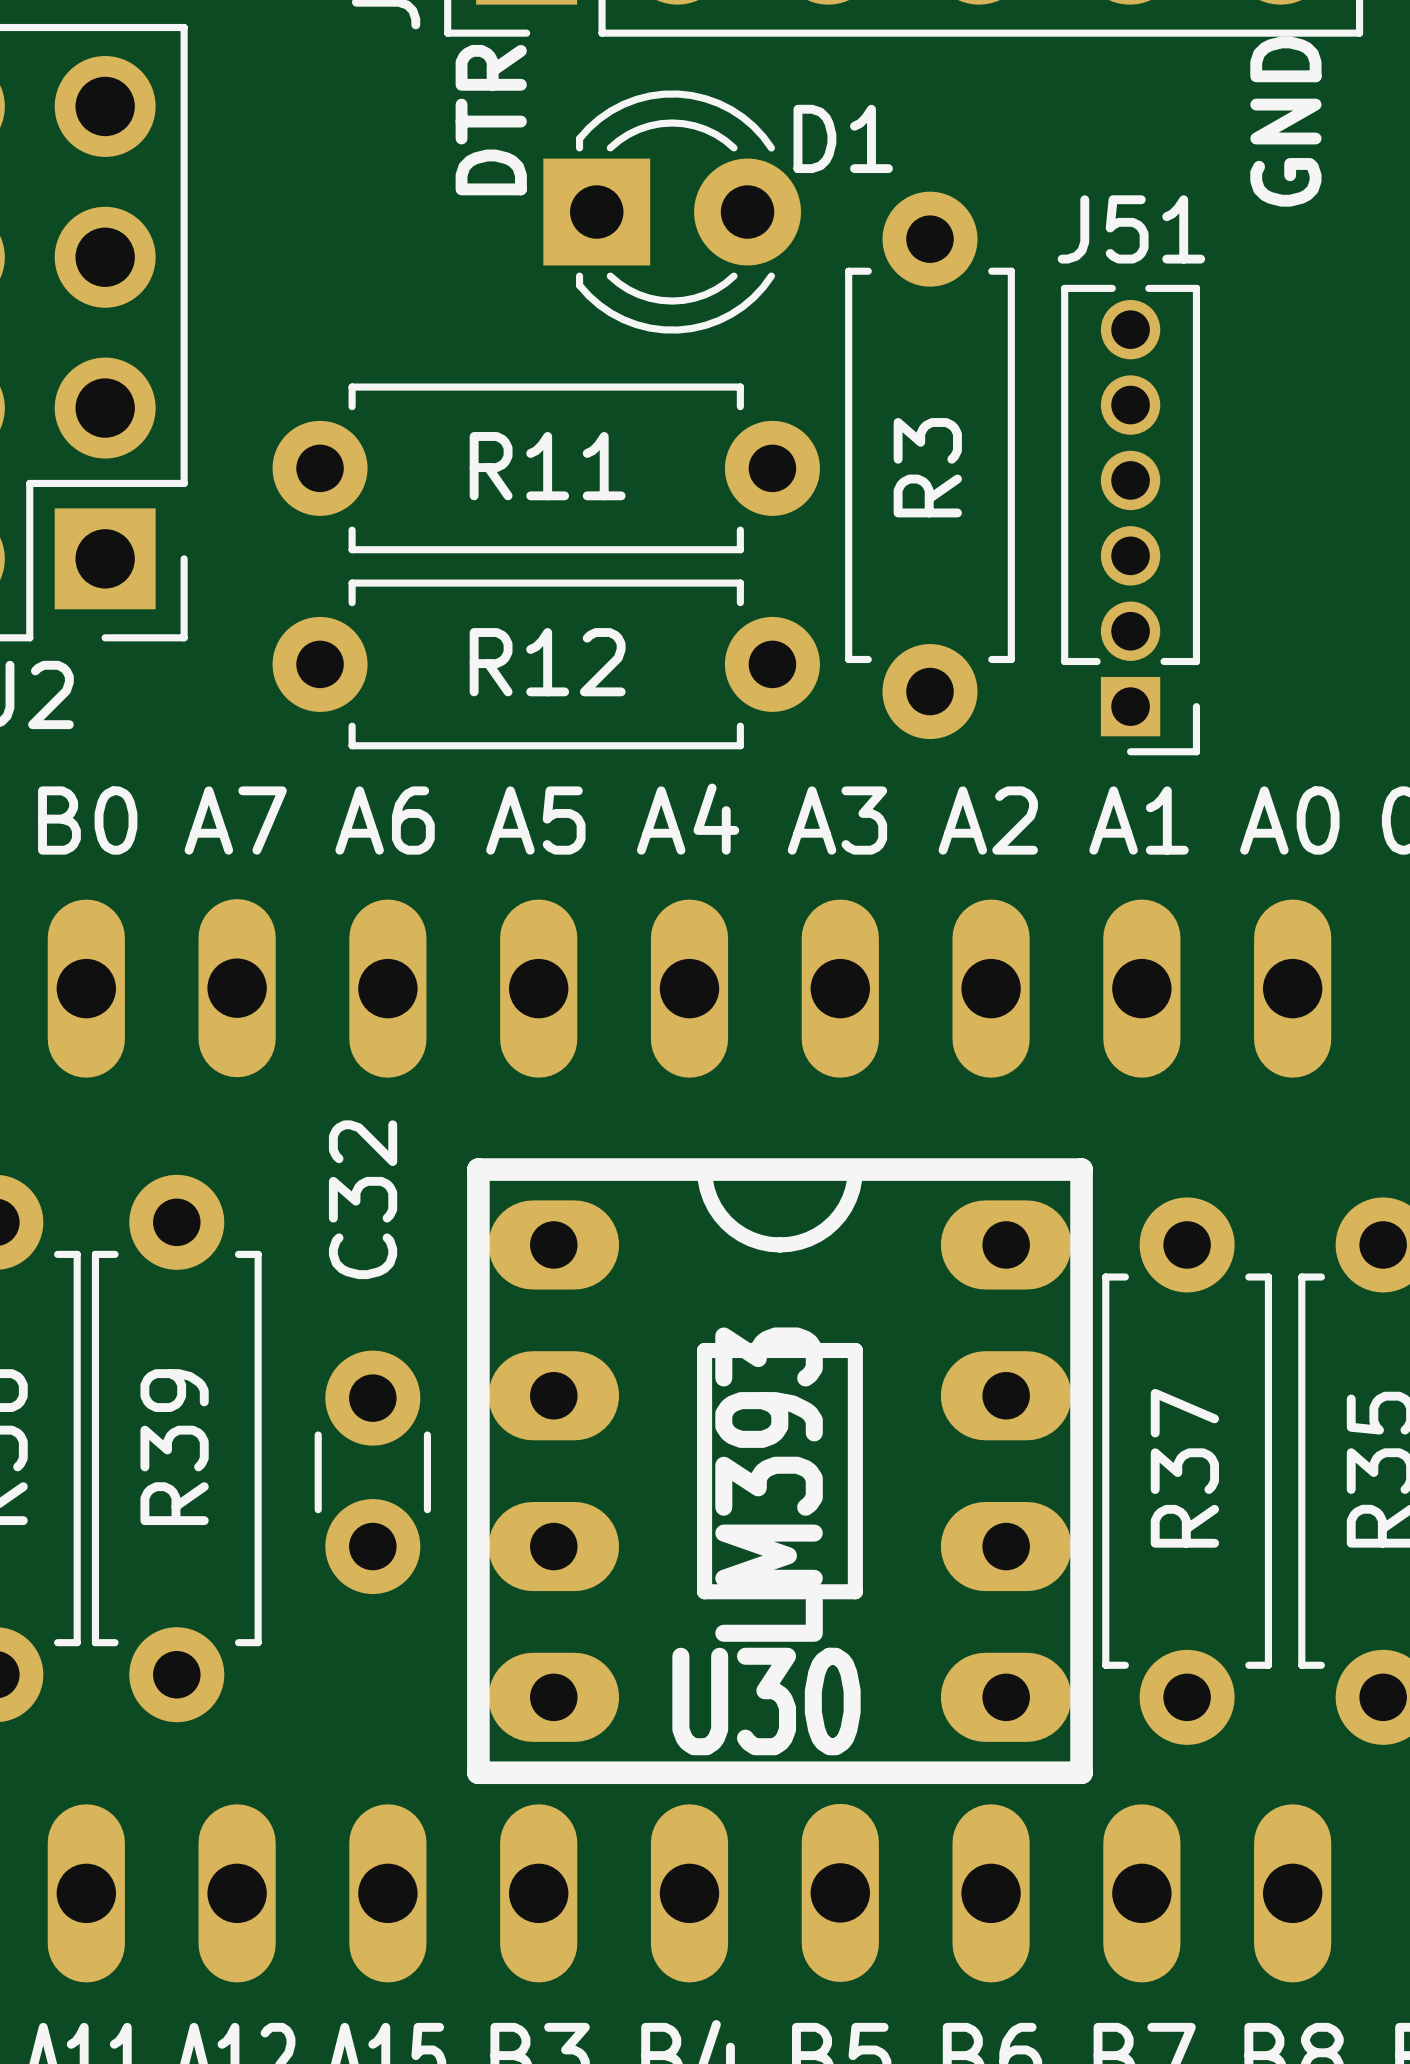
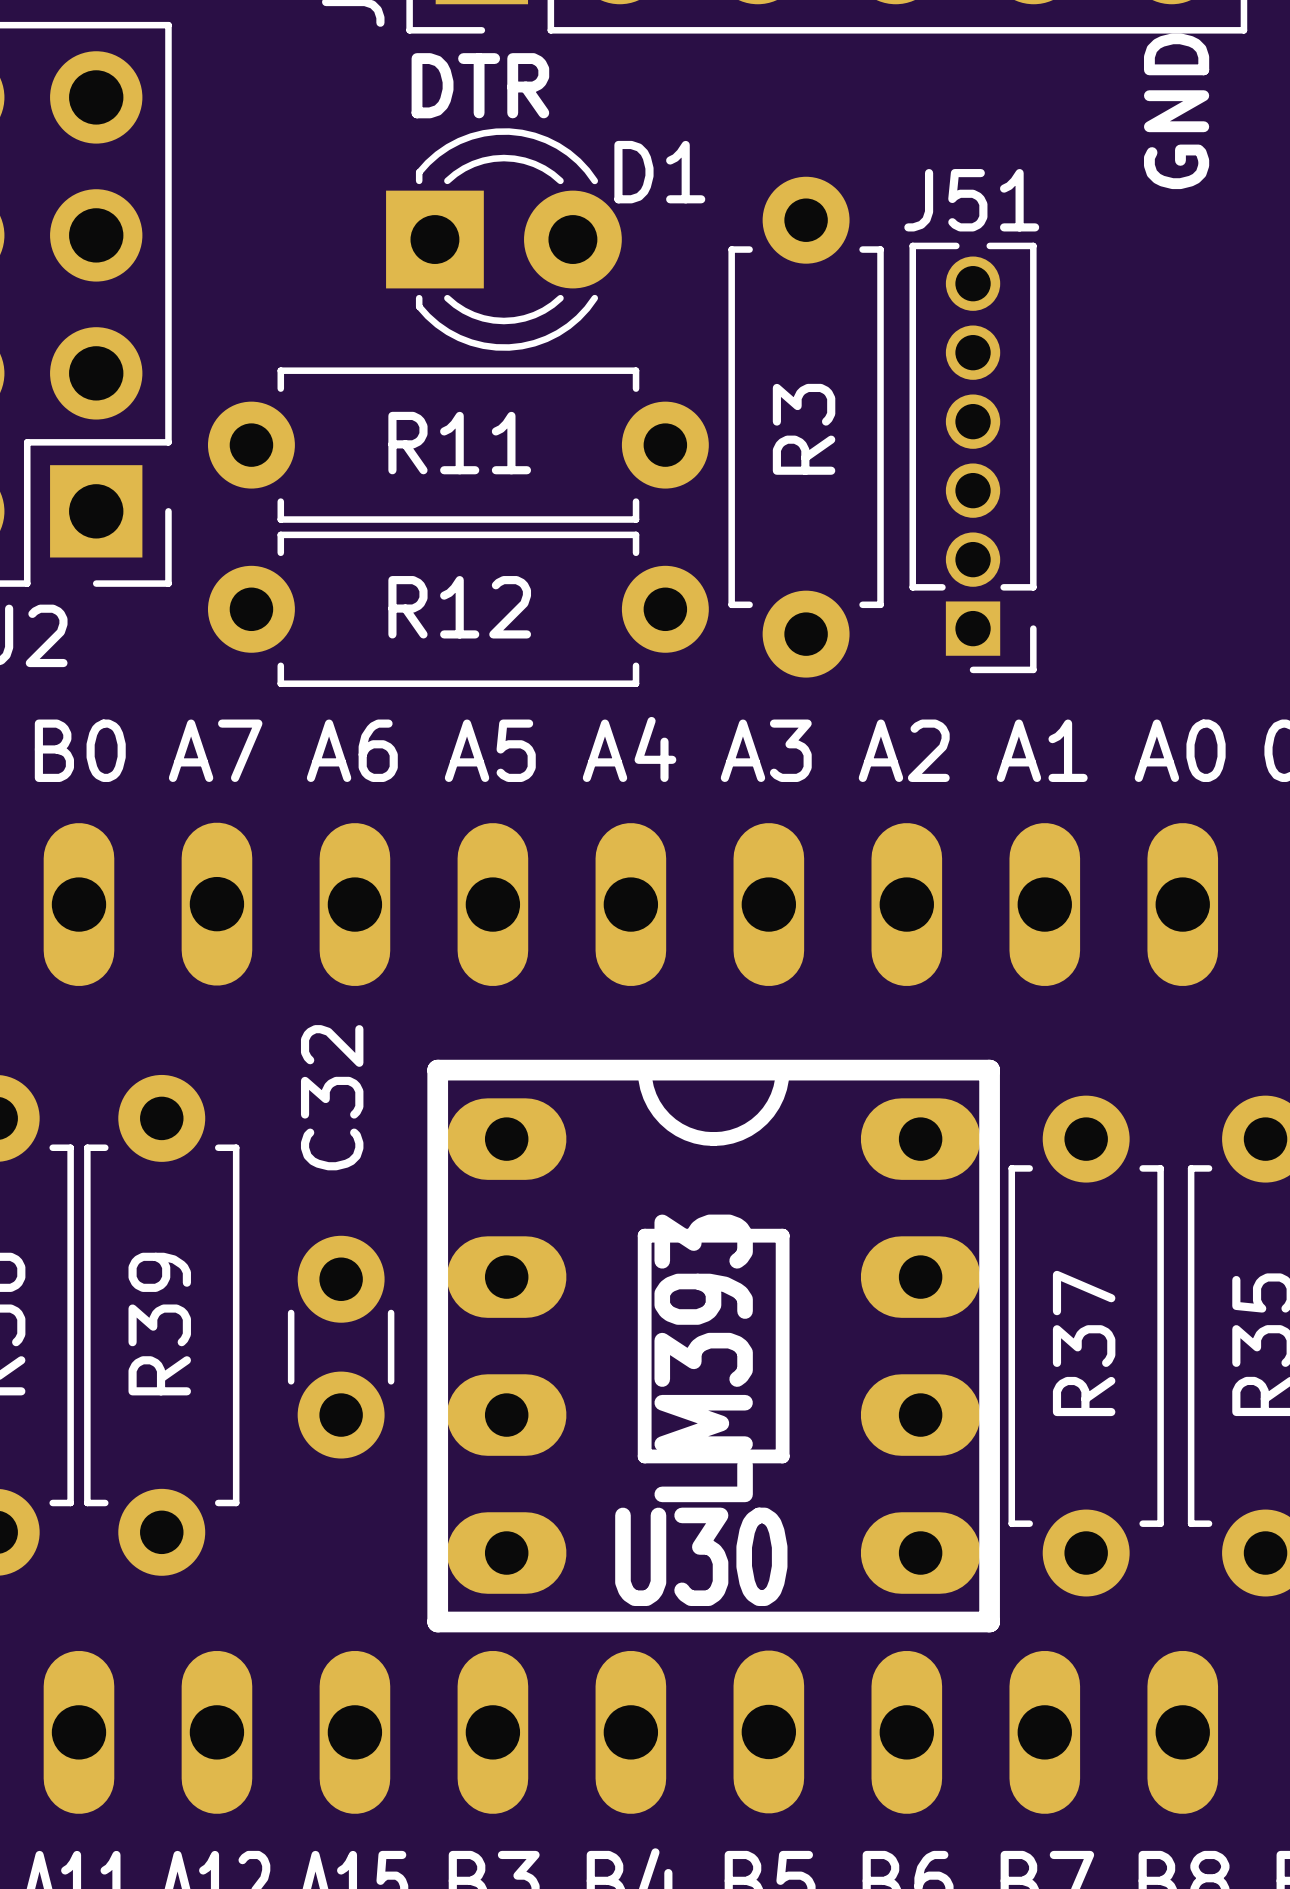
text rotation: 0° (491, 120) -> 90° clockwise (480, 85)
D1 position: (672, 212) -> (503, 239)
J51 name position: J51 (1131, 229) -> J51 (971, 200)
R3 position: (930, 465) -> (806, 427)
R11 position: (546, 468) -> (458, 445)
J51 position: (1130, 520) -> (973, 457)
R12 position: (546, 664) -> (458, 609)

